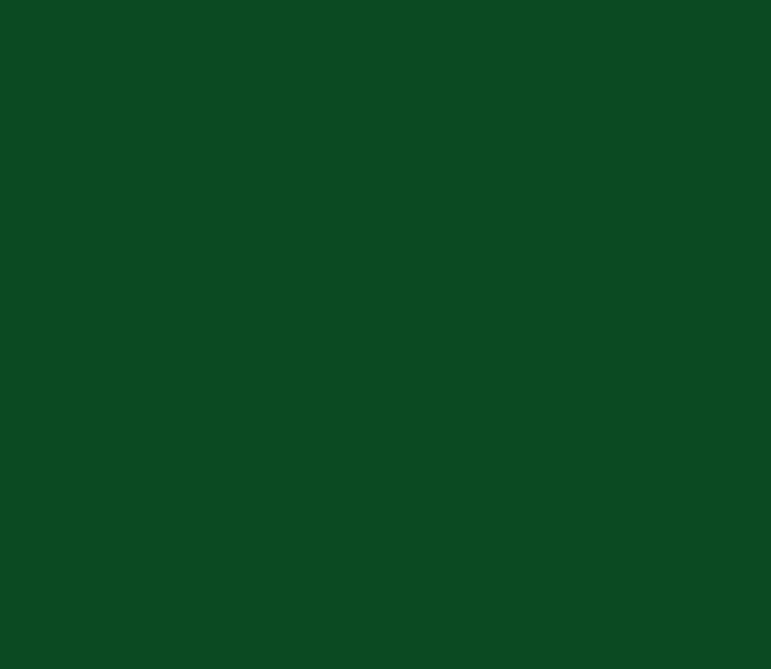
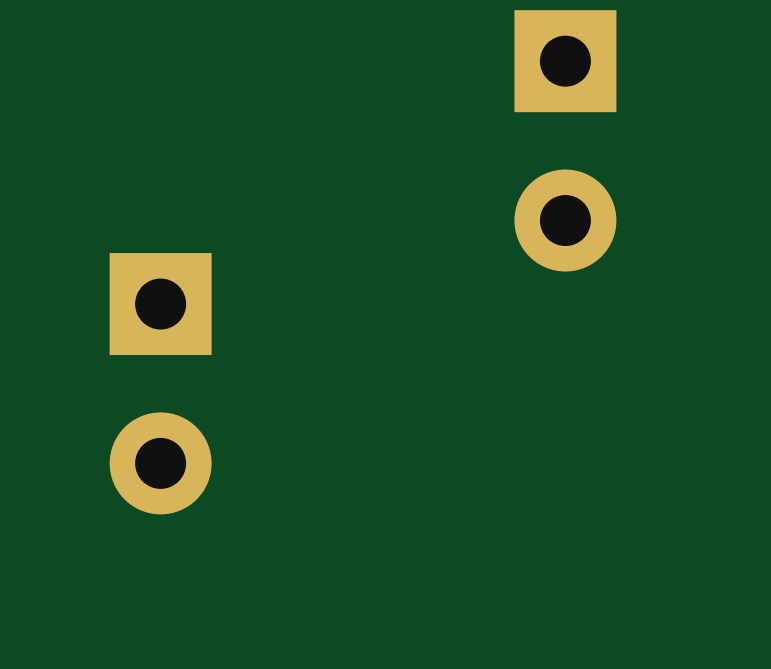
part: none -> (565, 140)
part: none -> (160, 383)

